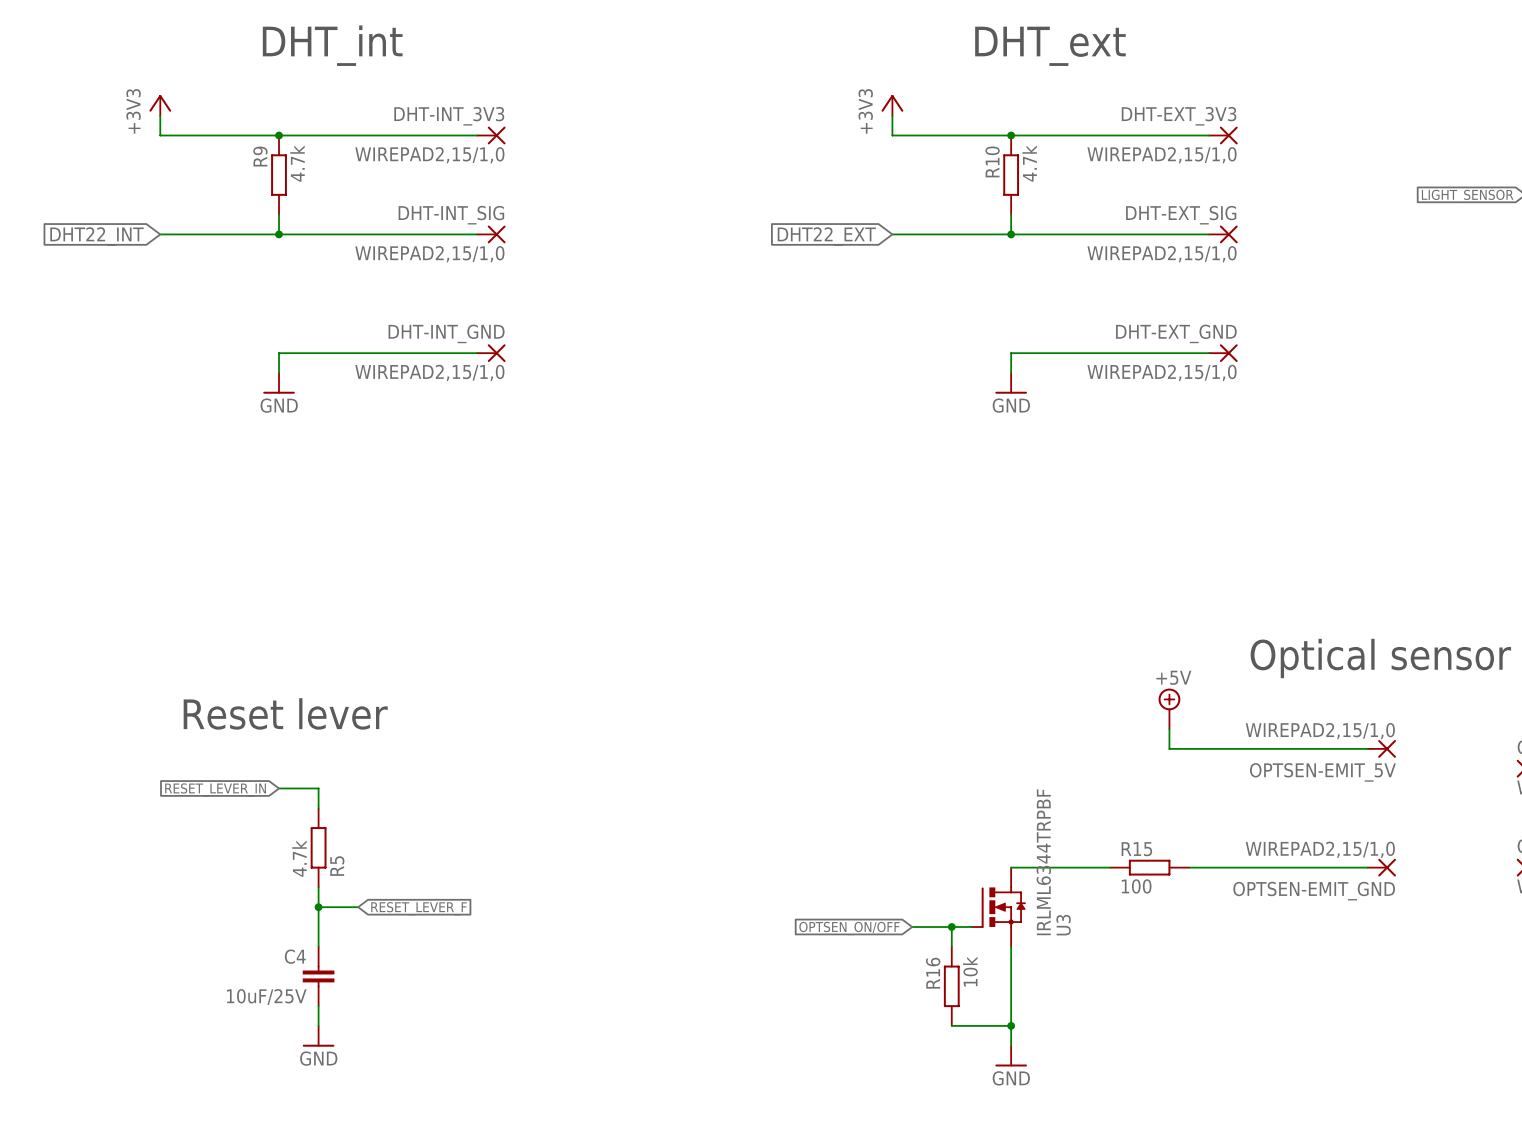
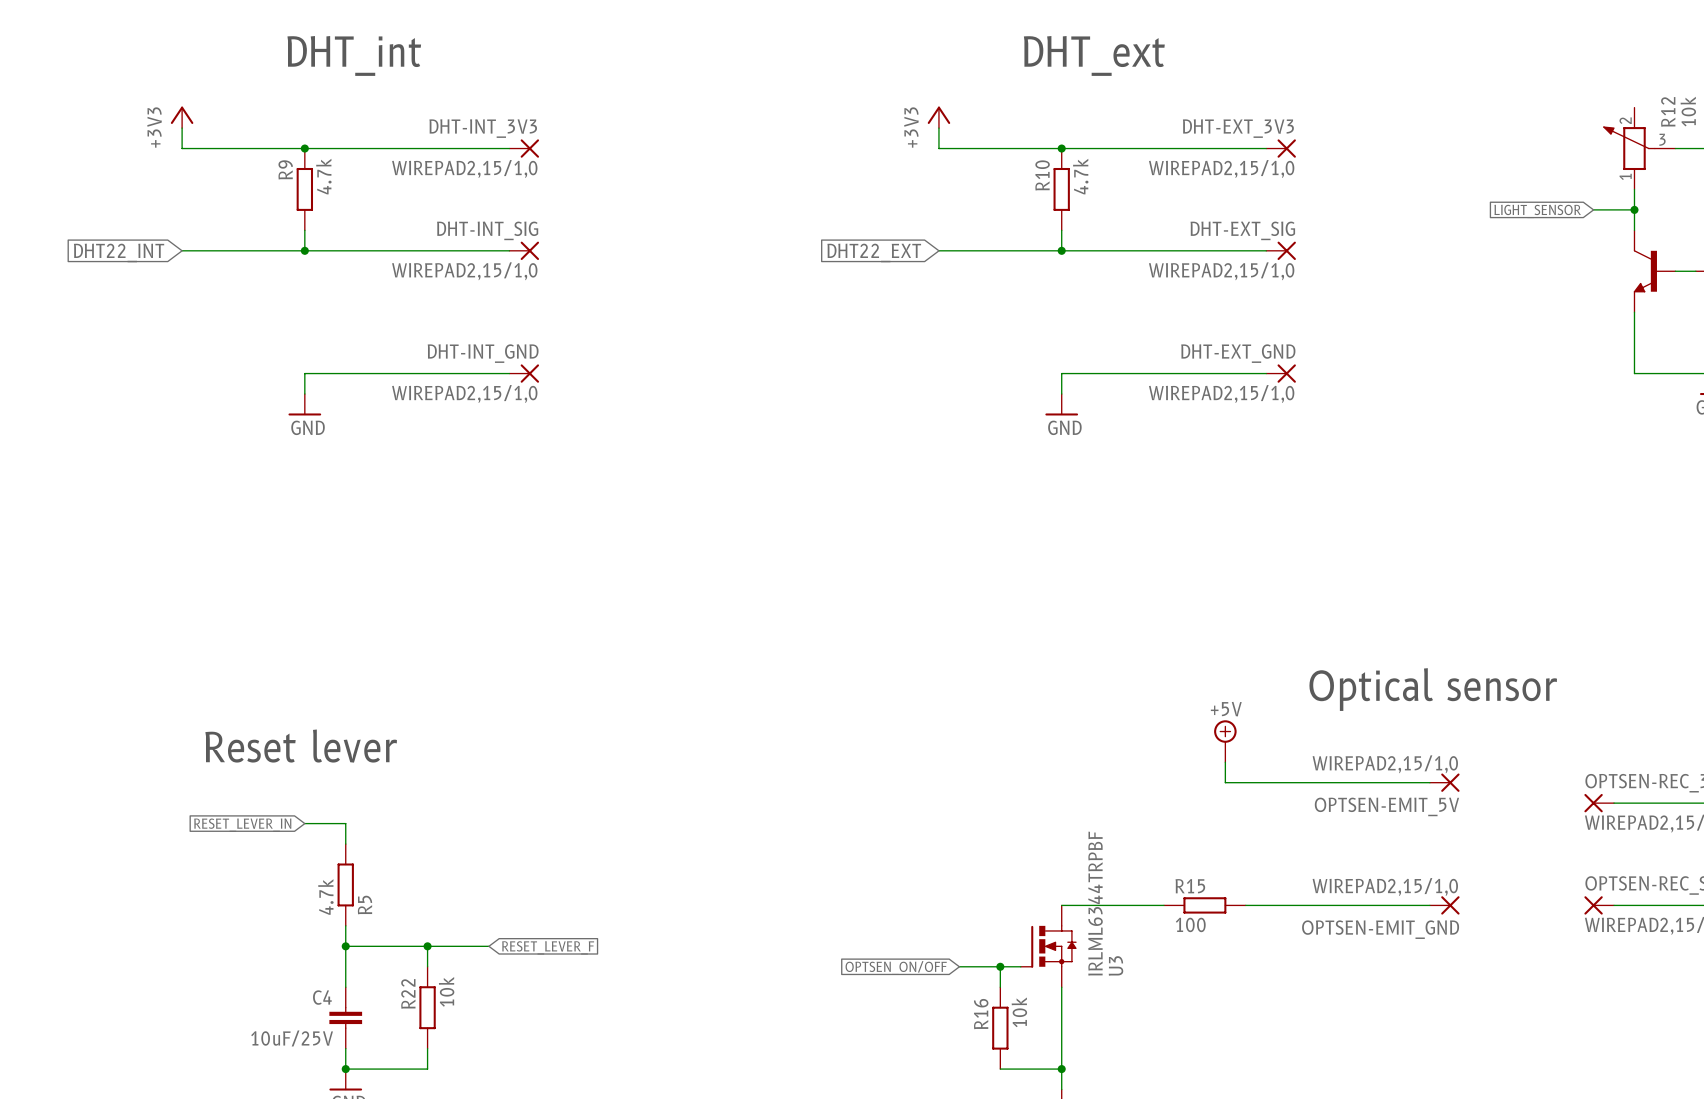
wire: none -> (386, 946) (488, 946)
wire: none -> (427, 946) (427, 966)
junction: none -> (427, 946)
global label position: RESET_LEVER_F (419, 908) -> RESET_LEVER_F (548, 947)
R22: none -> 10k (427, 1007)
wire: none -> (427, 1048) (427, 1069) (345, 1069)
junction: none -> (345, 1069)

